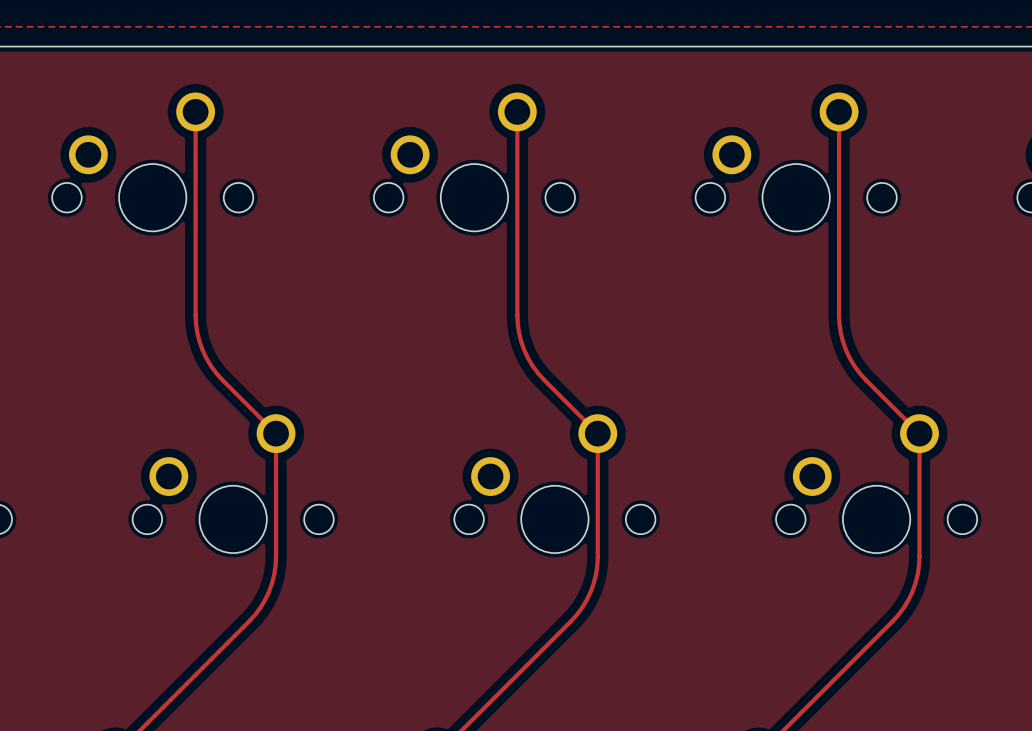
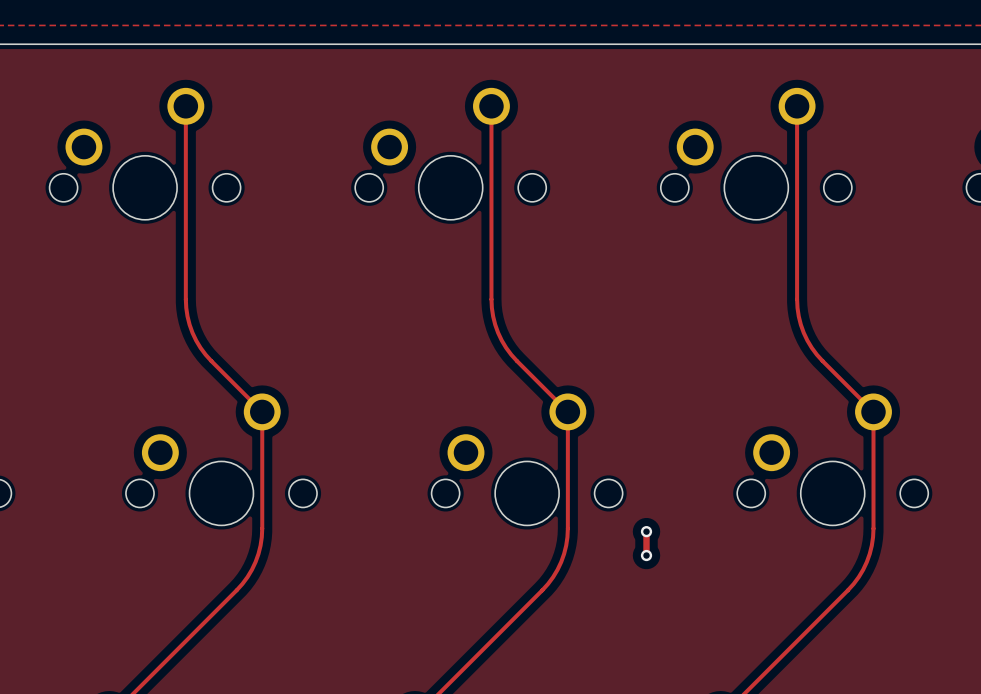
track: none -> (646, 531) (646, 555)
via: none -> (646, 531)
via: none -> (646, 555)

